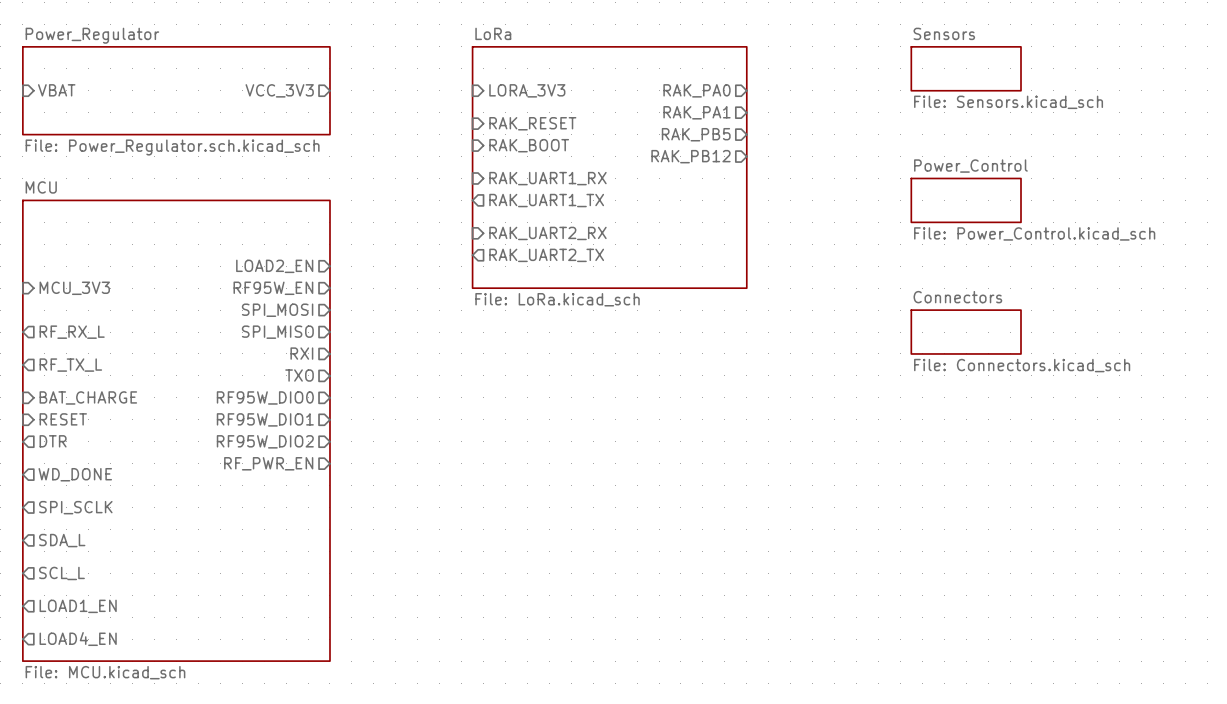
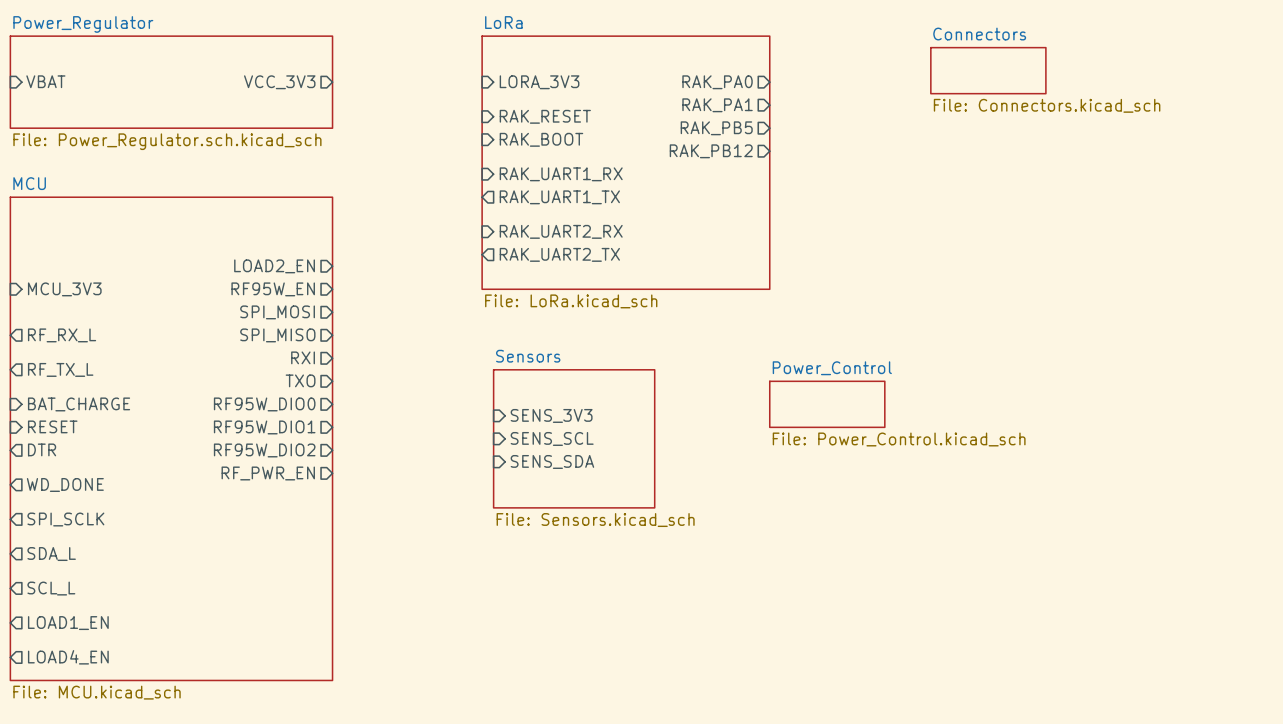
sheet Sensors: File: Sensors.kicad_sch (966, 68) -> none
sheet Connectors: none -> File: Connectors.kicad_sch (988, 70)
sheet Power_Control: File: Power_Control.kicad_sch (966, 200) -> none
sheet Connectors: File: Connectors.kicad_sch (966, 332) -> none
sheet Power_Control: none -> File: Power_Control.kicad_sch (827, 404)
sheet pin: none -> SENS_3V3 (551, 415)
sheet pin: none -> SENS_SCL (552, 438)
sheet Sensors: none -> File: Sensors.kicad_sch (574, 438)
sheet pin: none -> SENS_SDA (552, 461)

